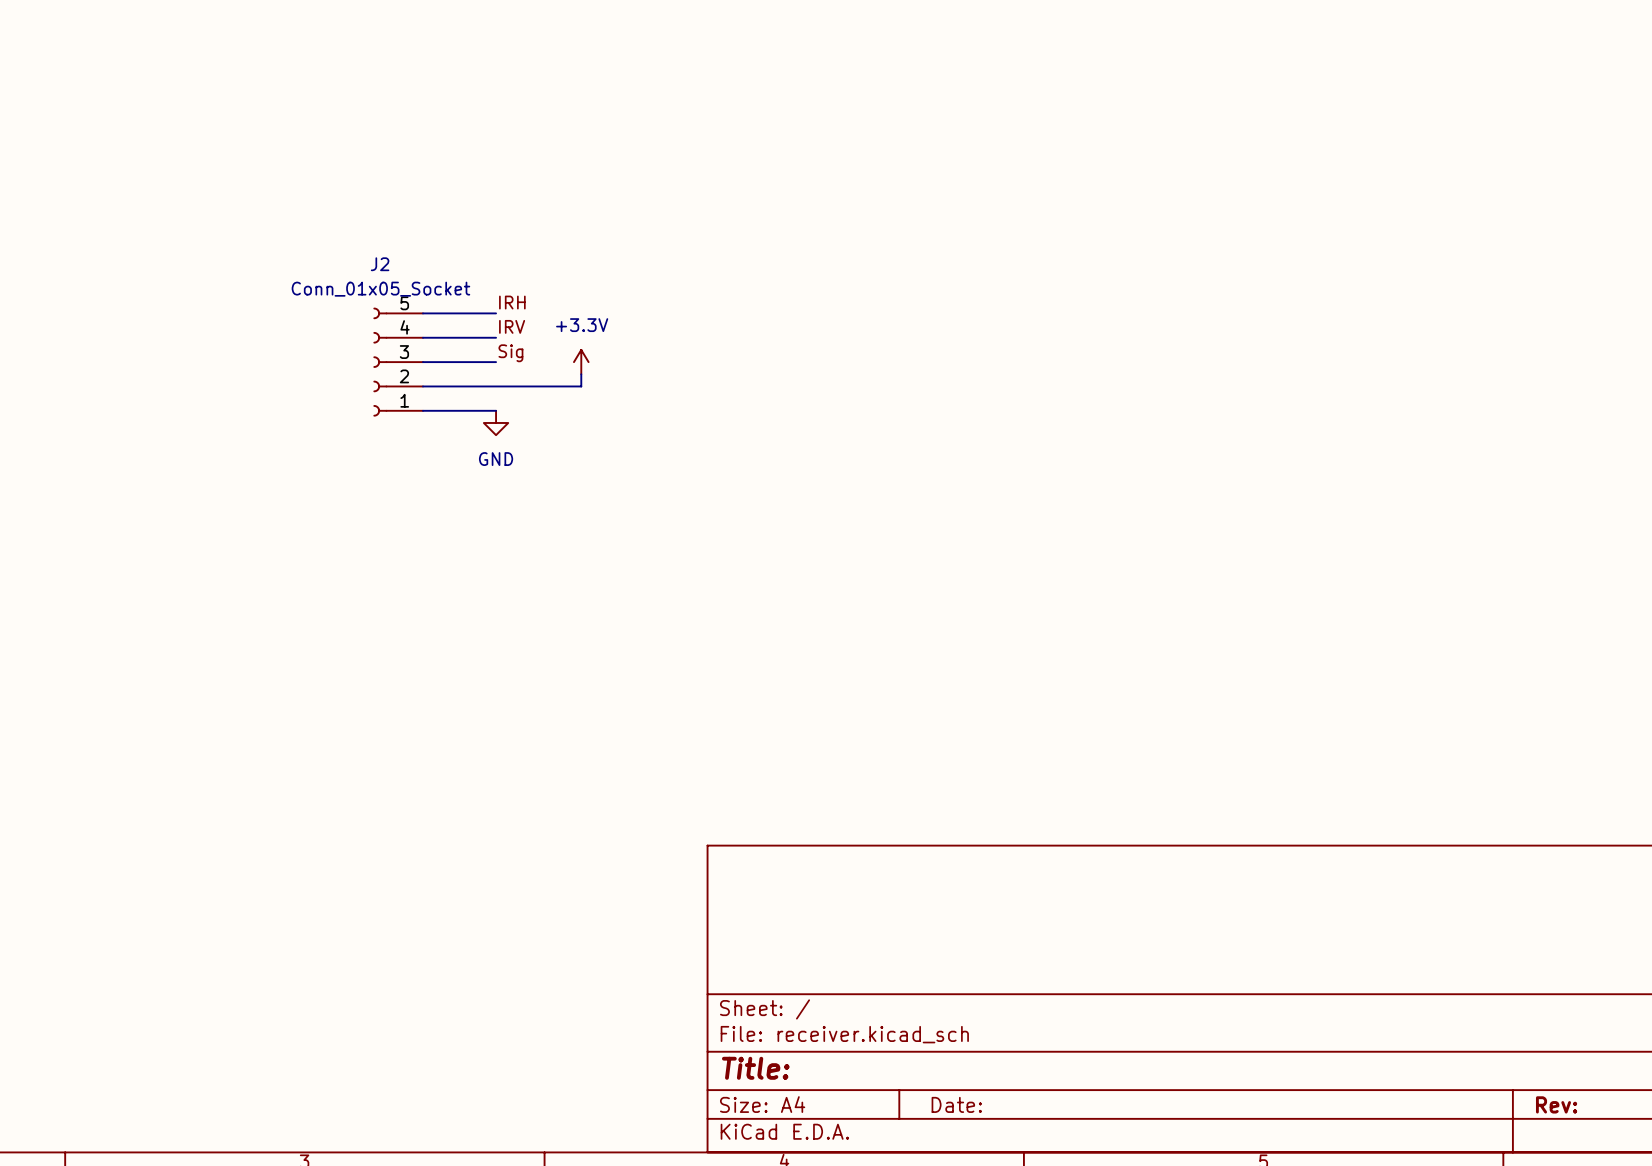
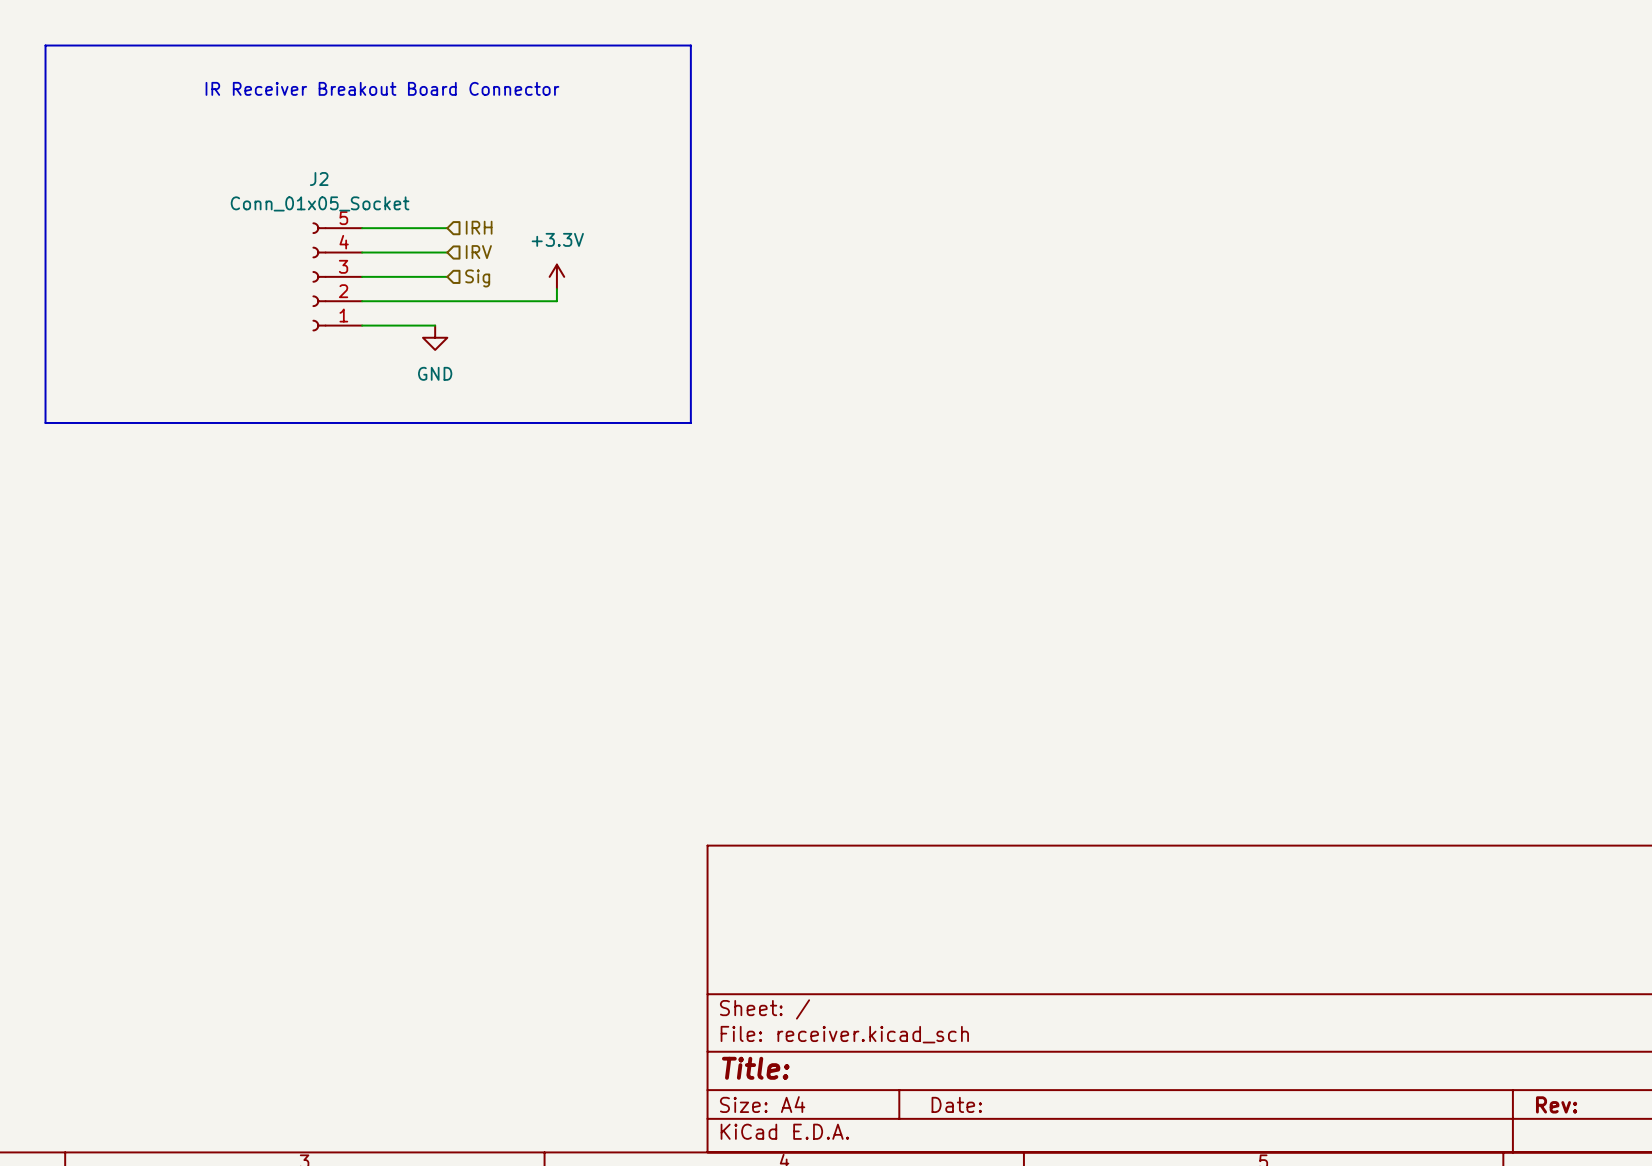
line: none -> (45, 45) (690, 45) (690, 422) (45, 422) (45, 45)
text: none -> IR Receiver Breakout Board Connector (382, 88)
hierarchical label: none -> IRH (479, 227)
wire: none -> (362, 228) (447, 228)
wire: none -> (362, 252) (447, 252)
hierarchical label: none -> IRV (478, 252)
wire: none -> (362, 276) (447, 276)
hierarchical label: none -> Sig (477, 278)
wire: none -> (556, 289) (556, 301) (362, 301)
label: IRH (512, 302) -> none
wire: (422, 313) (496, 313) -> none
label: IRV (512, 326) -> none
wire: (422, 337) (496, 337) -> (362, 325) (435, 325)
label: Sig (510, 353) -> none
J2 position: (398, 362) -> (337, 276)
wire: (422, 362) (496, 362) -> none
power symbol position: +3.3V (581, 362) -> +3.3V (556, 276)
wire: (581, 374) (581, 386) (422, 386) -> none
wire: (422, 410) (496, 410) -> none
power symbol position: GND (496, 422) -> GND (435, 337)

